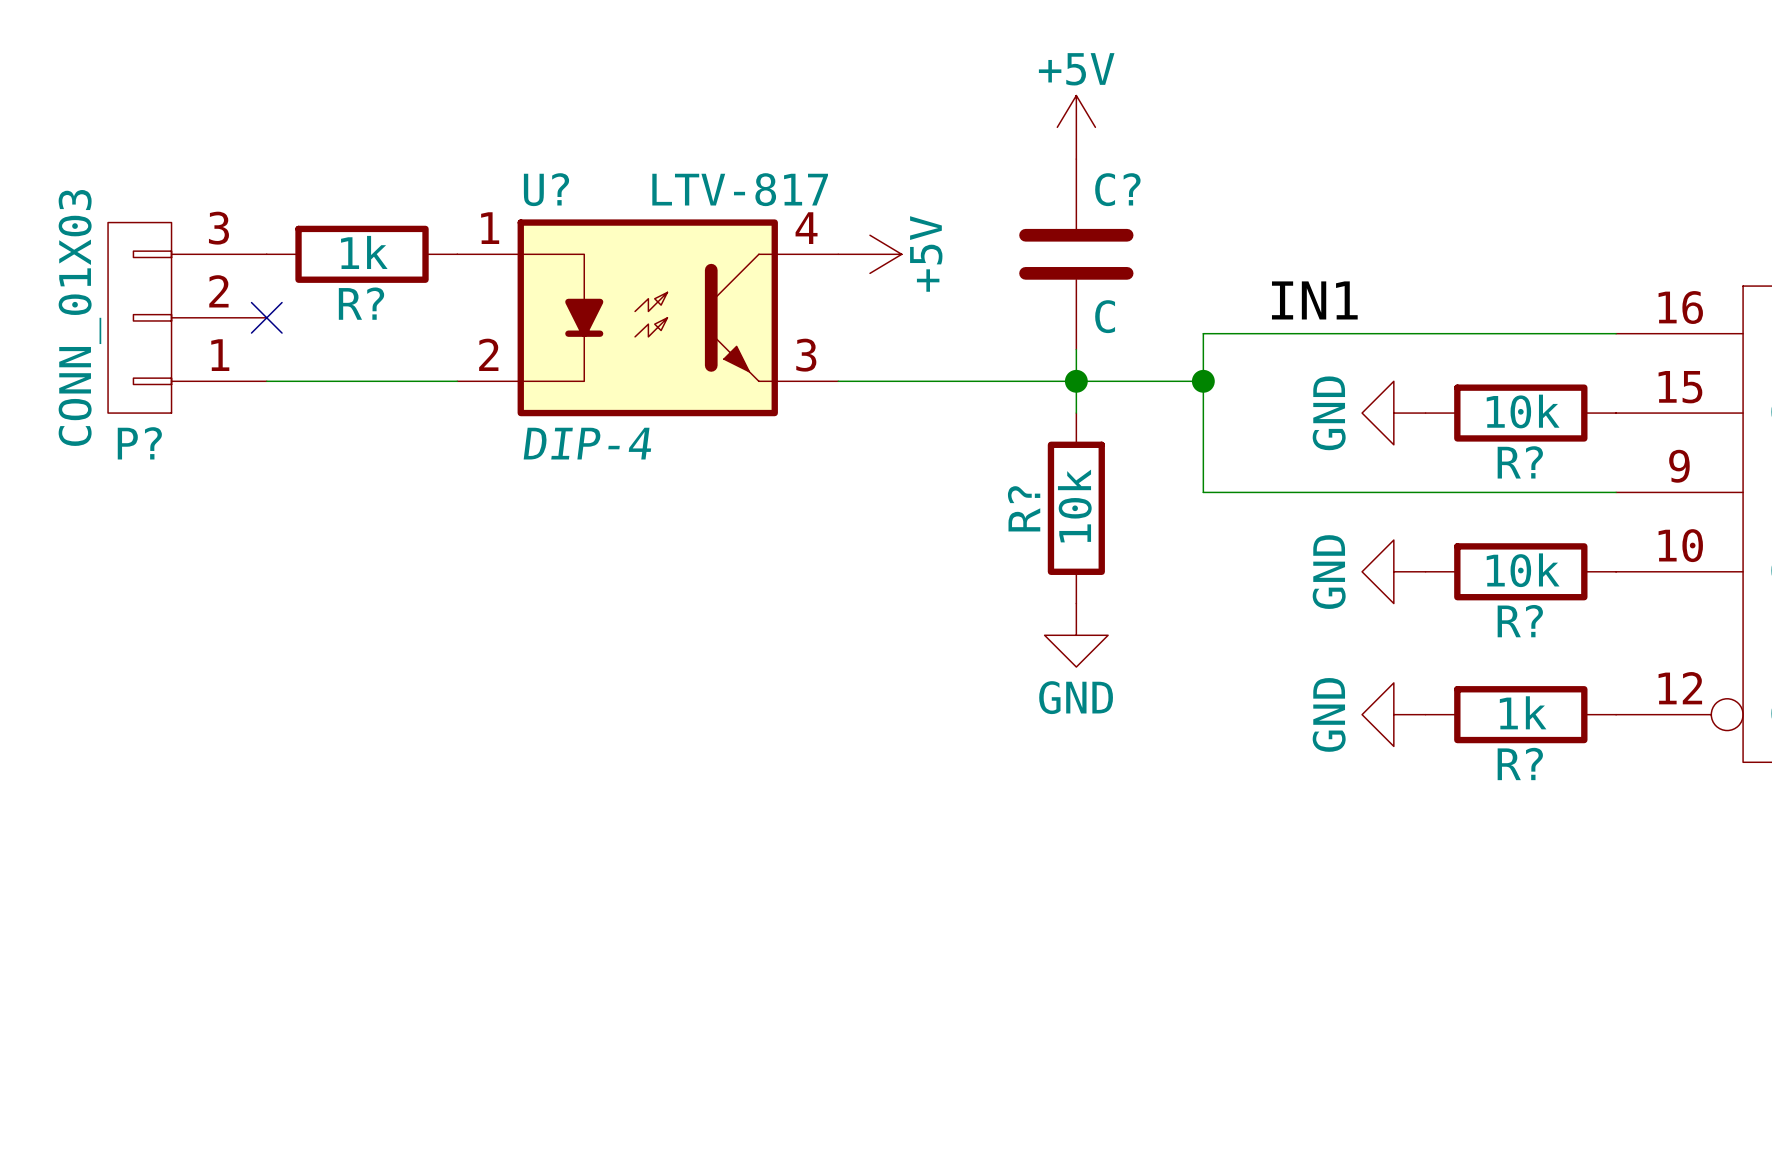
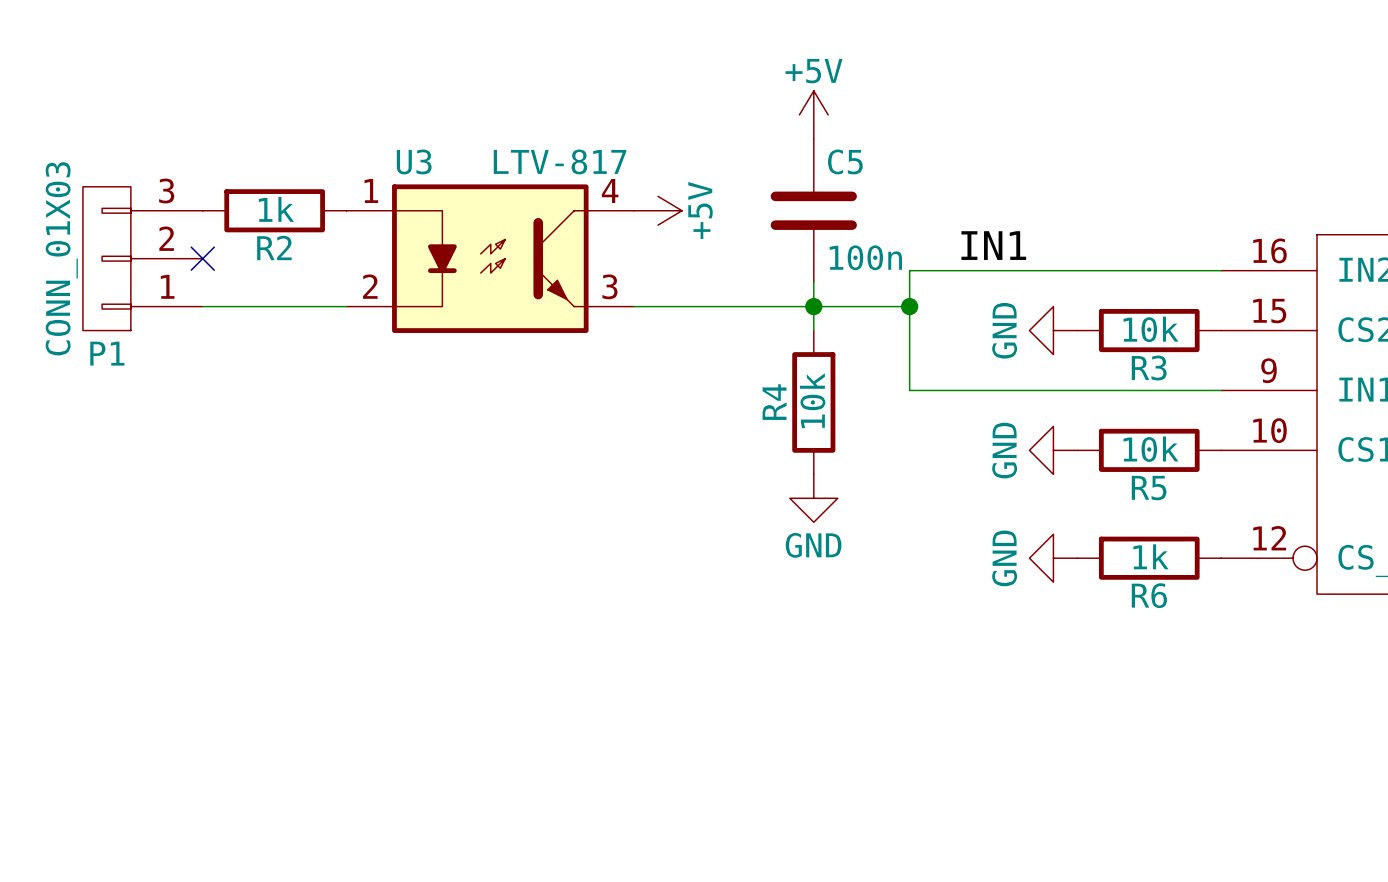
U? name: U? (546, 189) -> U3 (414, 161)
C? name: C? (1117, 189) -> C5 (845, 161)
R? name: R? (361, 303) -> R2 (274, 247)
C? value: C (1105, 316) -> 100n (865, 257)
P? name: P? (139, 443) -> P1 (107, 353)
U? text: DIP-4 (587, 443) -> none
R? name: R? (1520, 462) -> R3 (1149, 368)
R? name: R? (1024, 508) -> R4 (774, 402)
R? name: R? (1520, 621) -> R5 (1149, 488)
R? name: R? (1520, 763) -> R6 (1149, 595)

